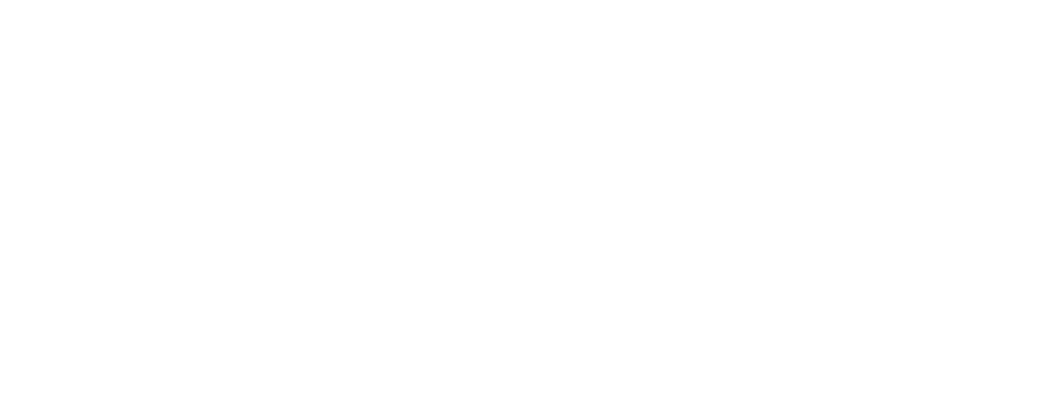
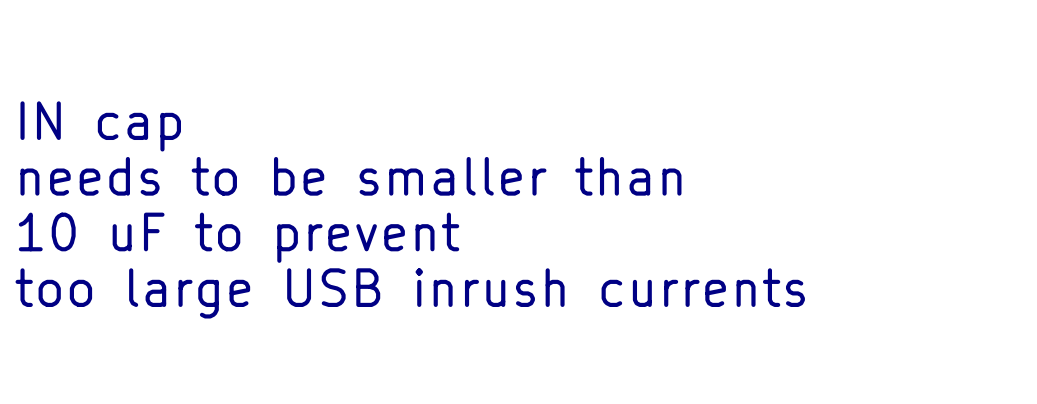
text: none -> IN cap (100, 126)
text: none -> needs to be smaller than (350, 176)
text: none -> 10 uF to prevent (239, 237)
text: none -> too large USB inrush currents (410, 293)

